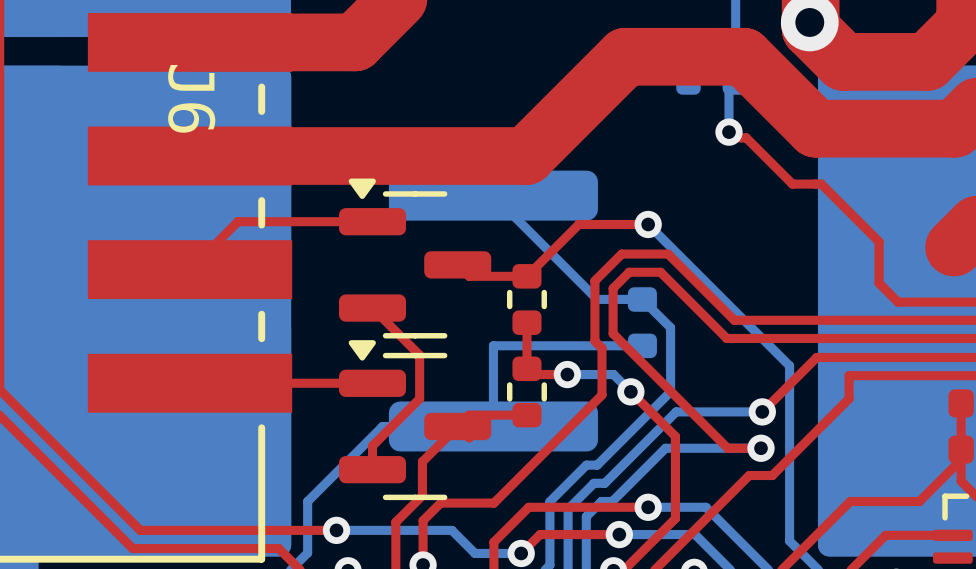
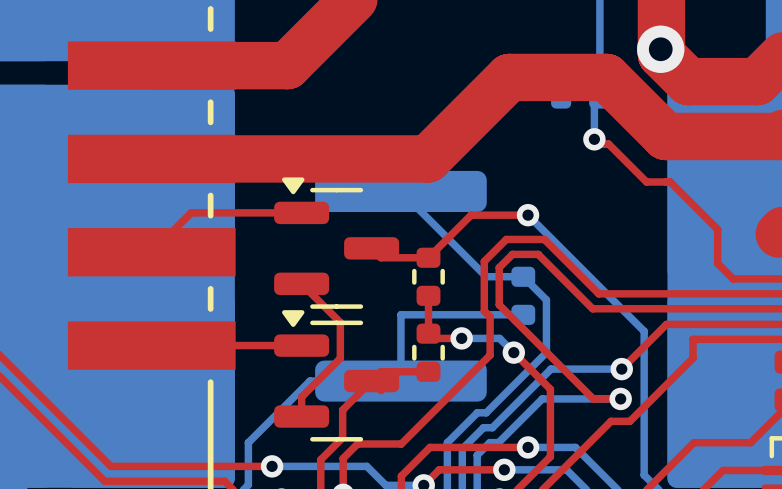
J6 name: J6 (191, 98) -> none

